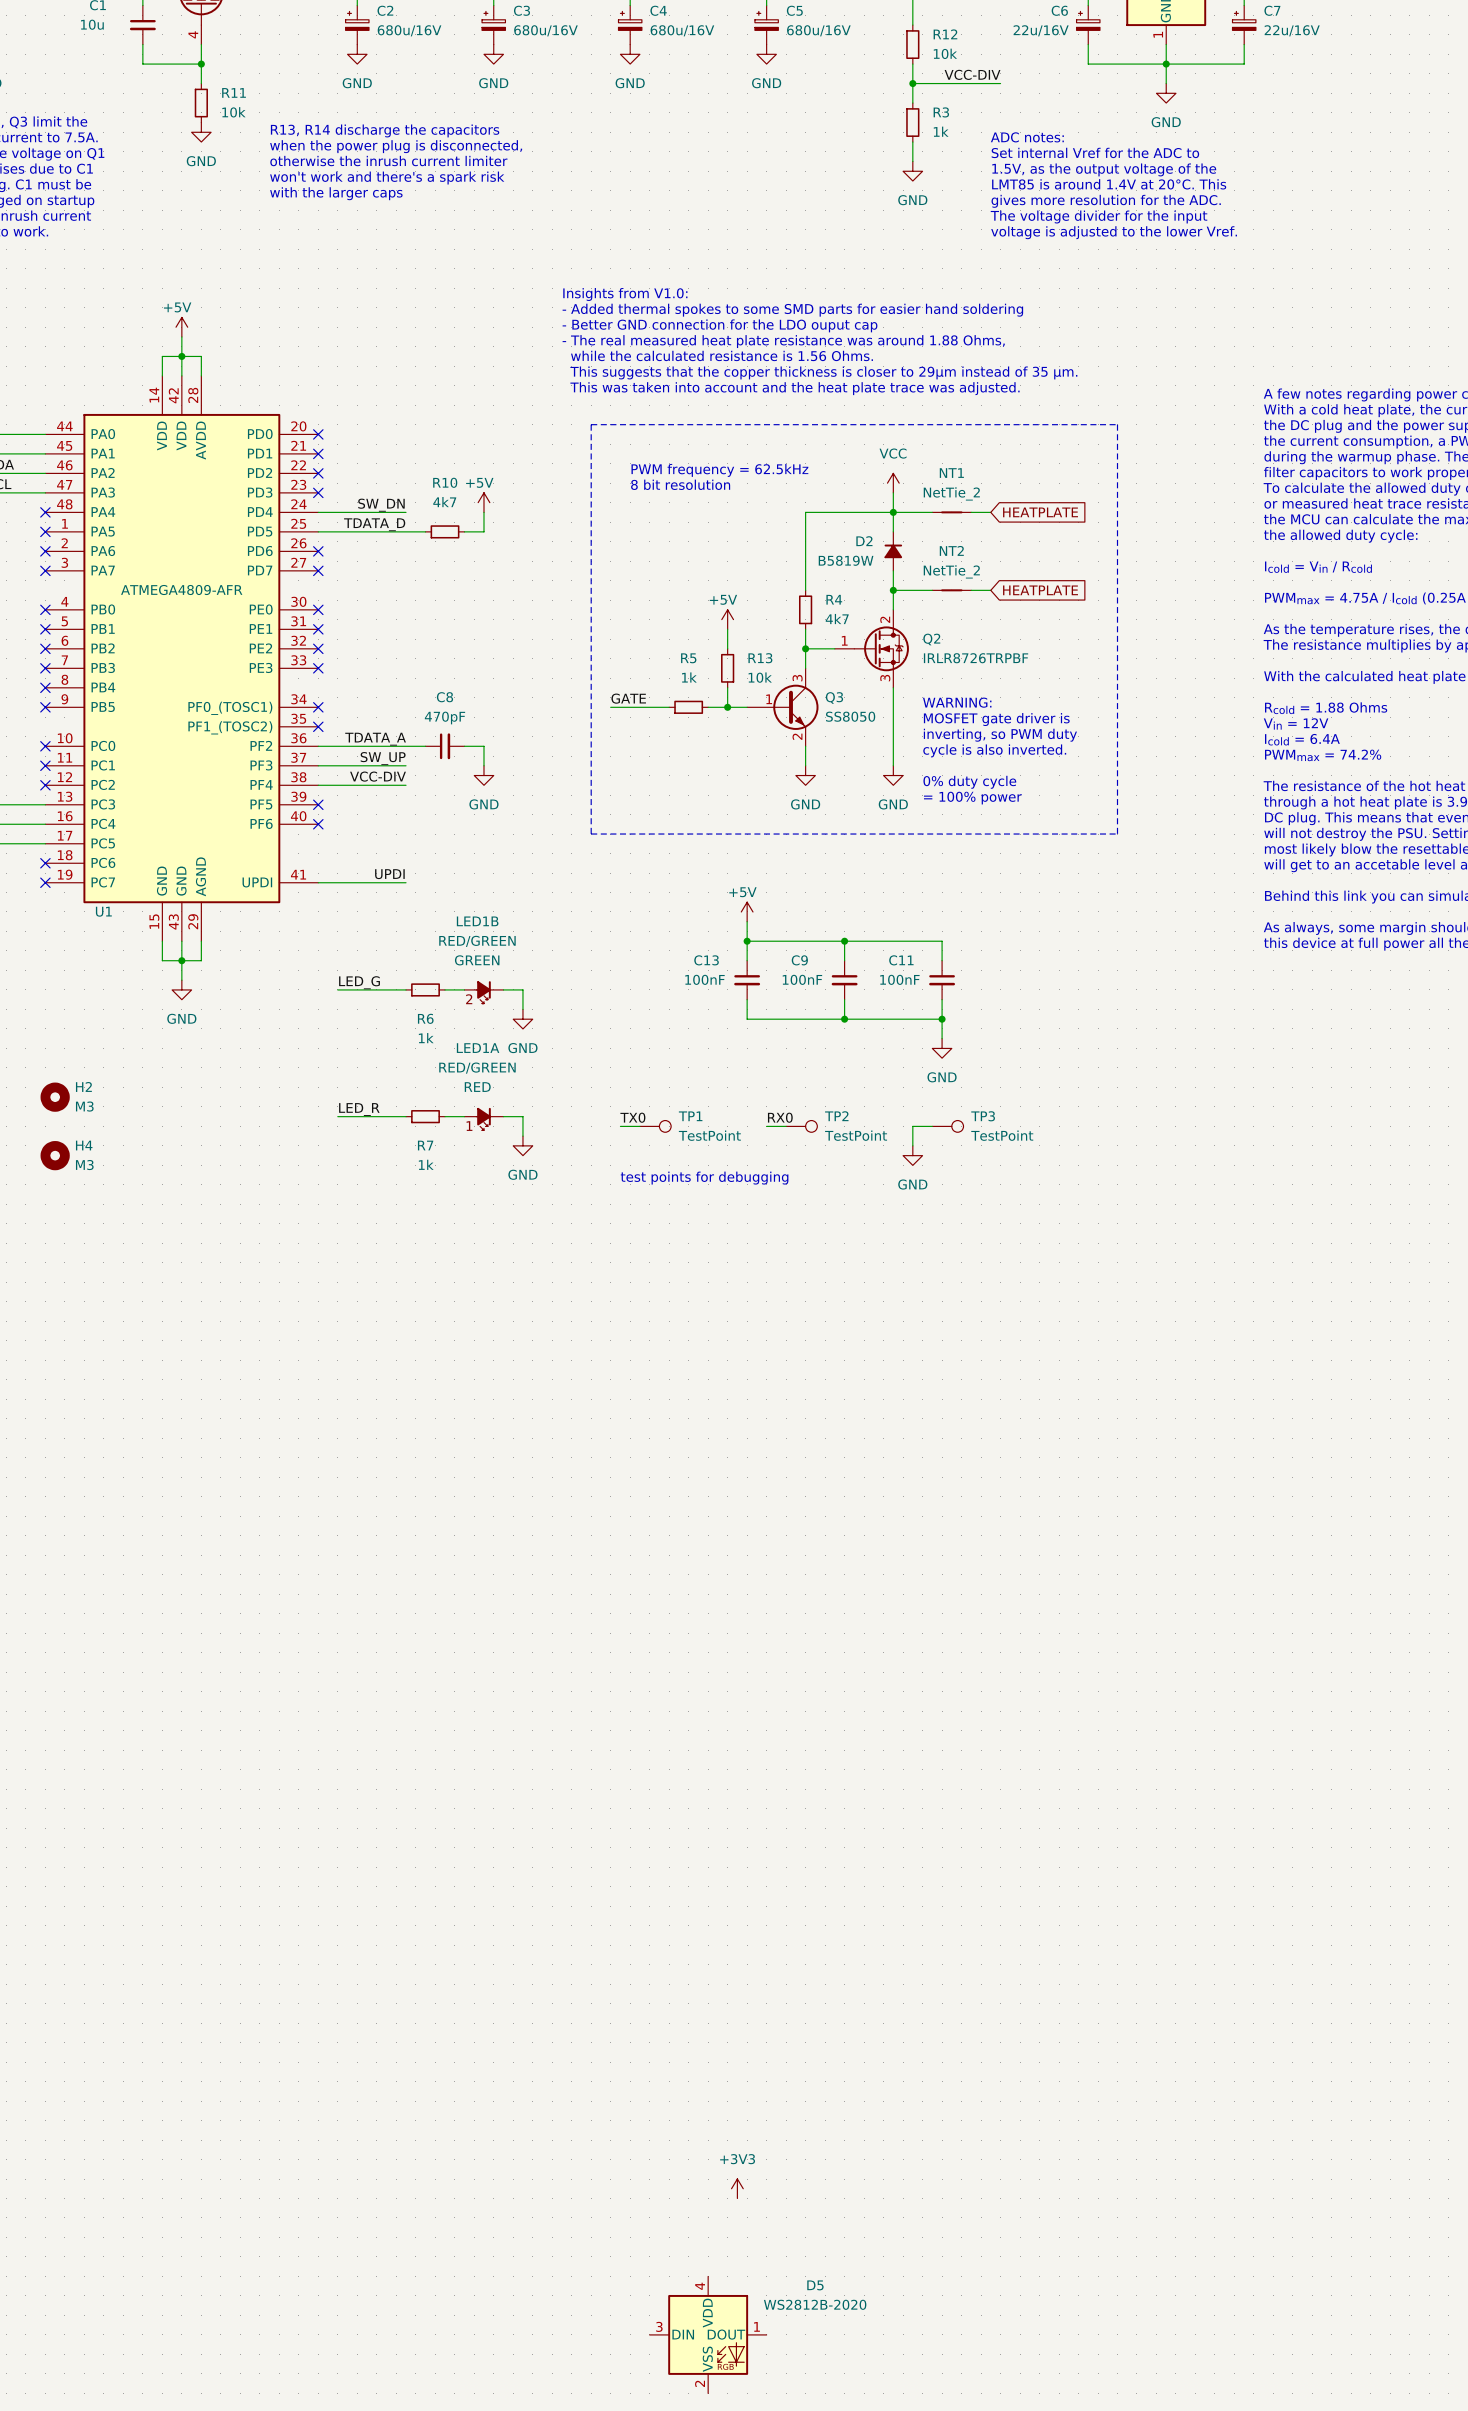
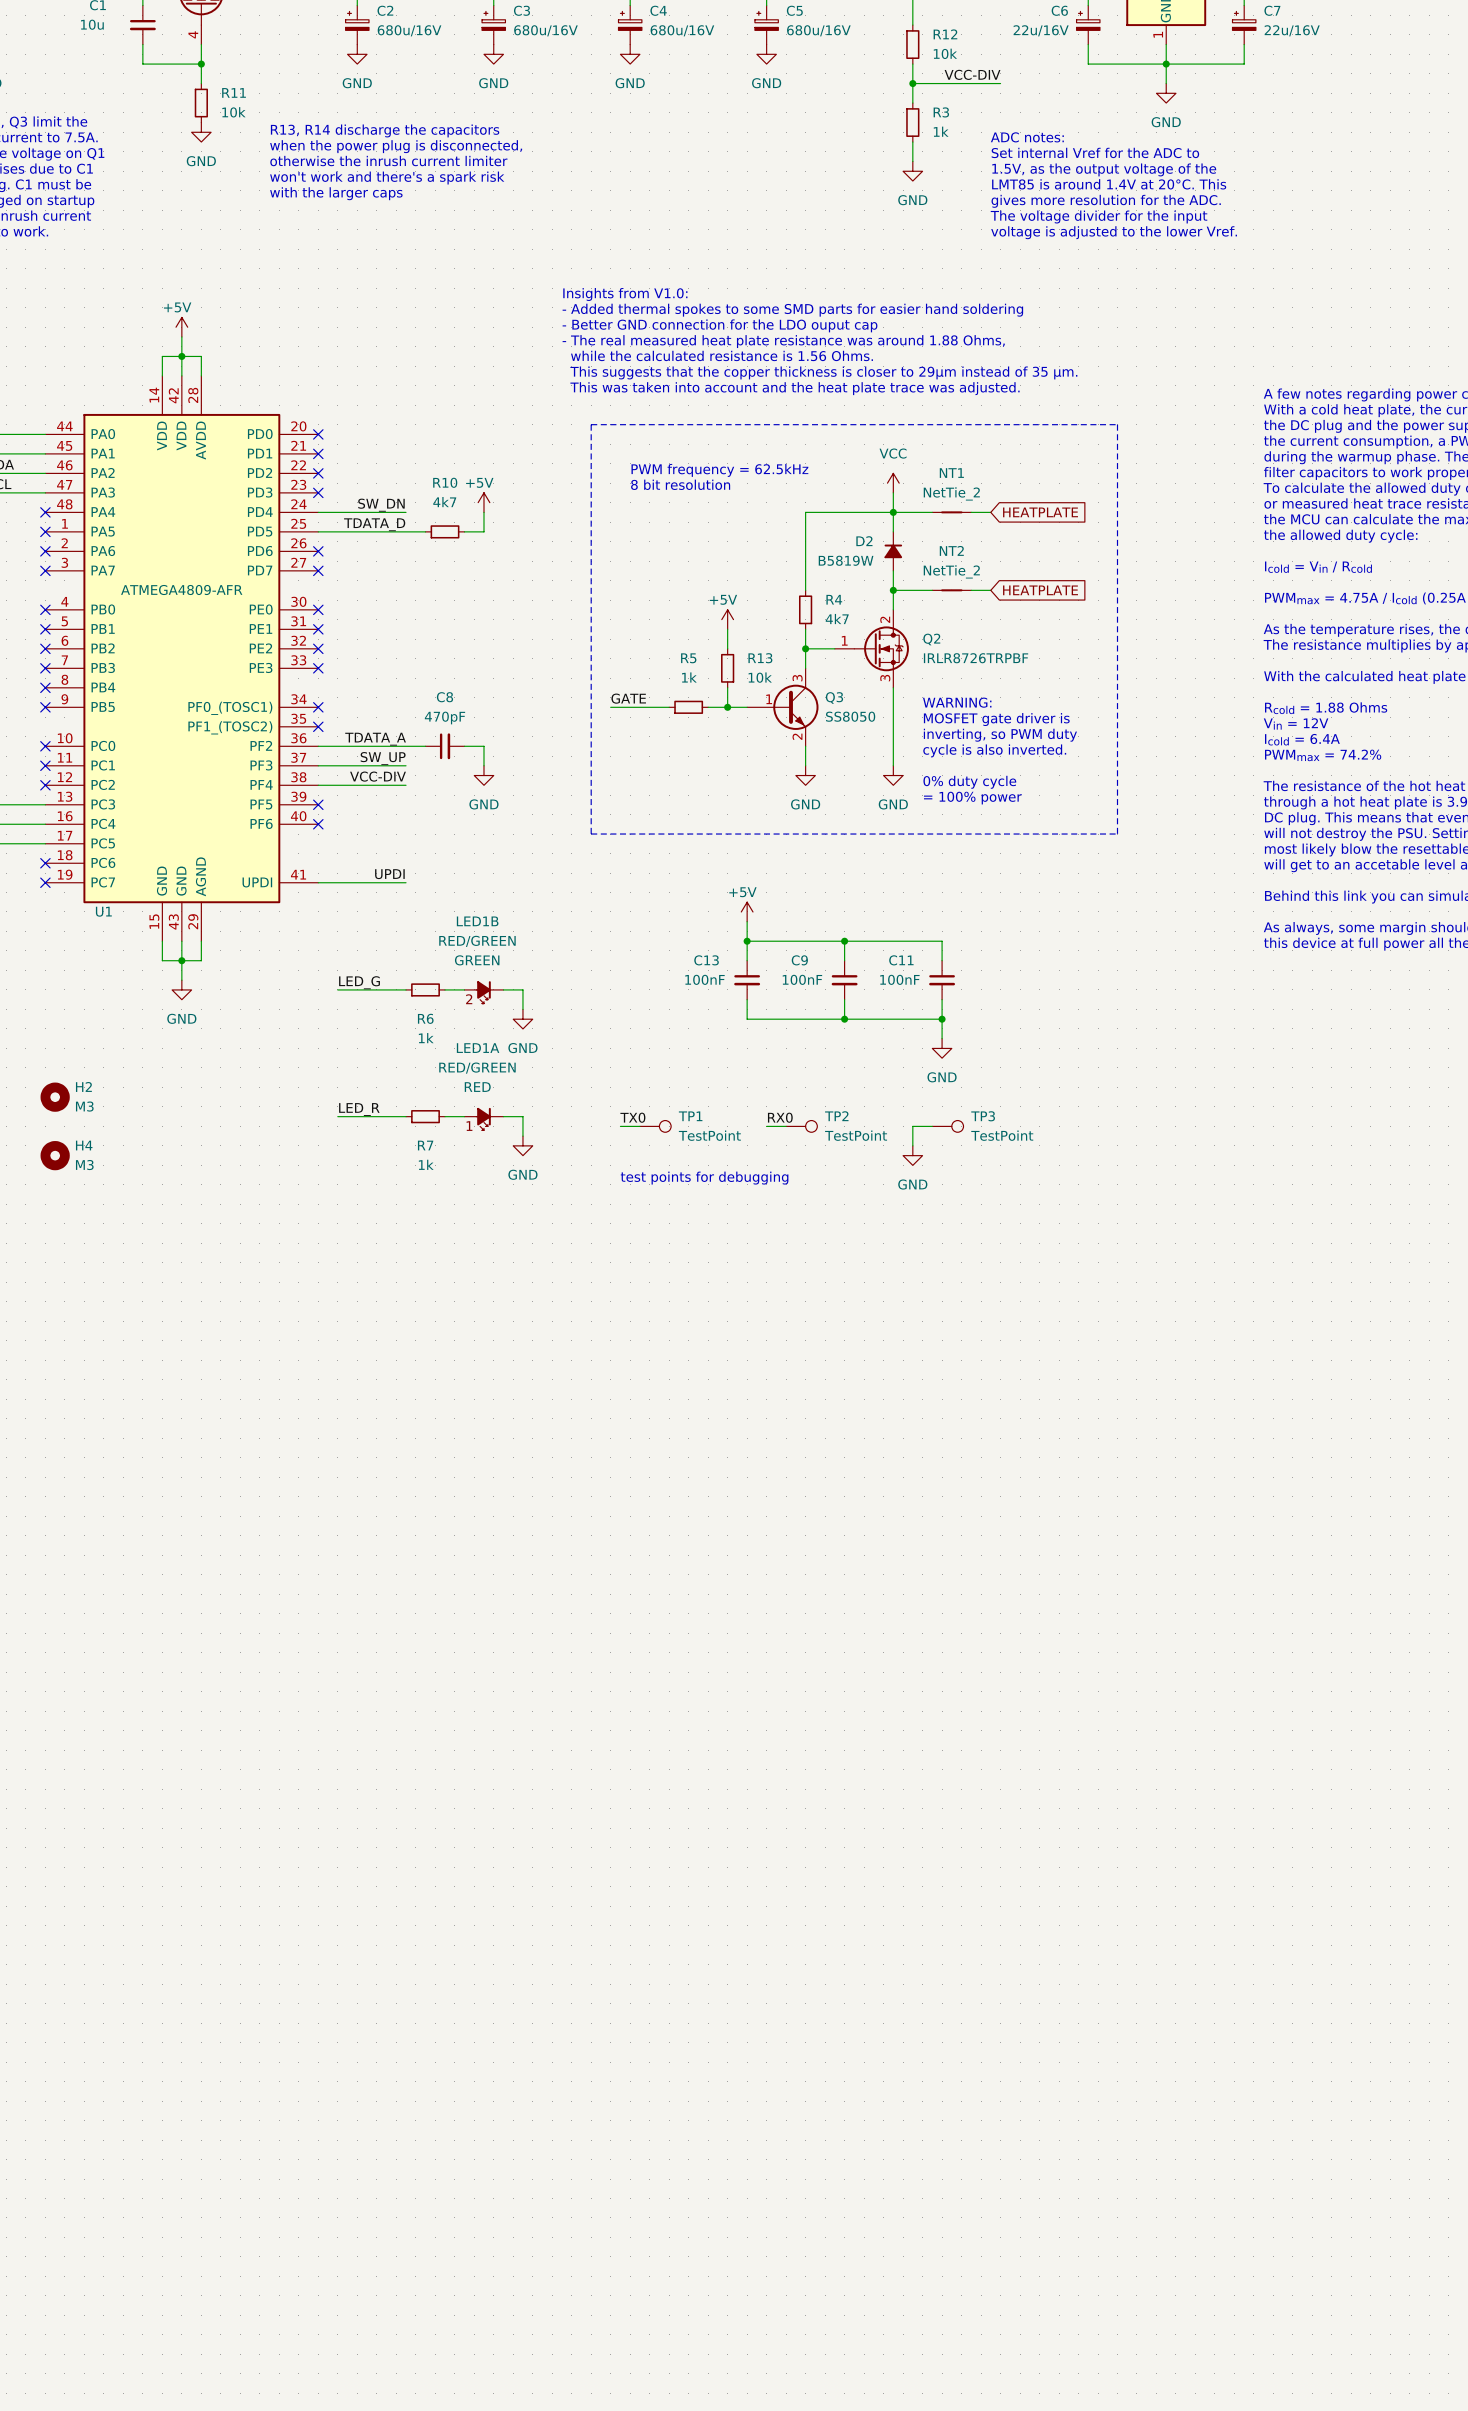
power symbol: +3V3 (737, 2188) -> none
D5: WS2812B-2020 (708, 2334) -> none

